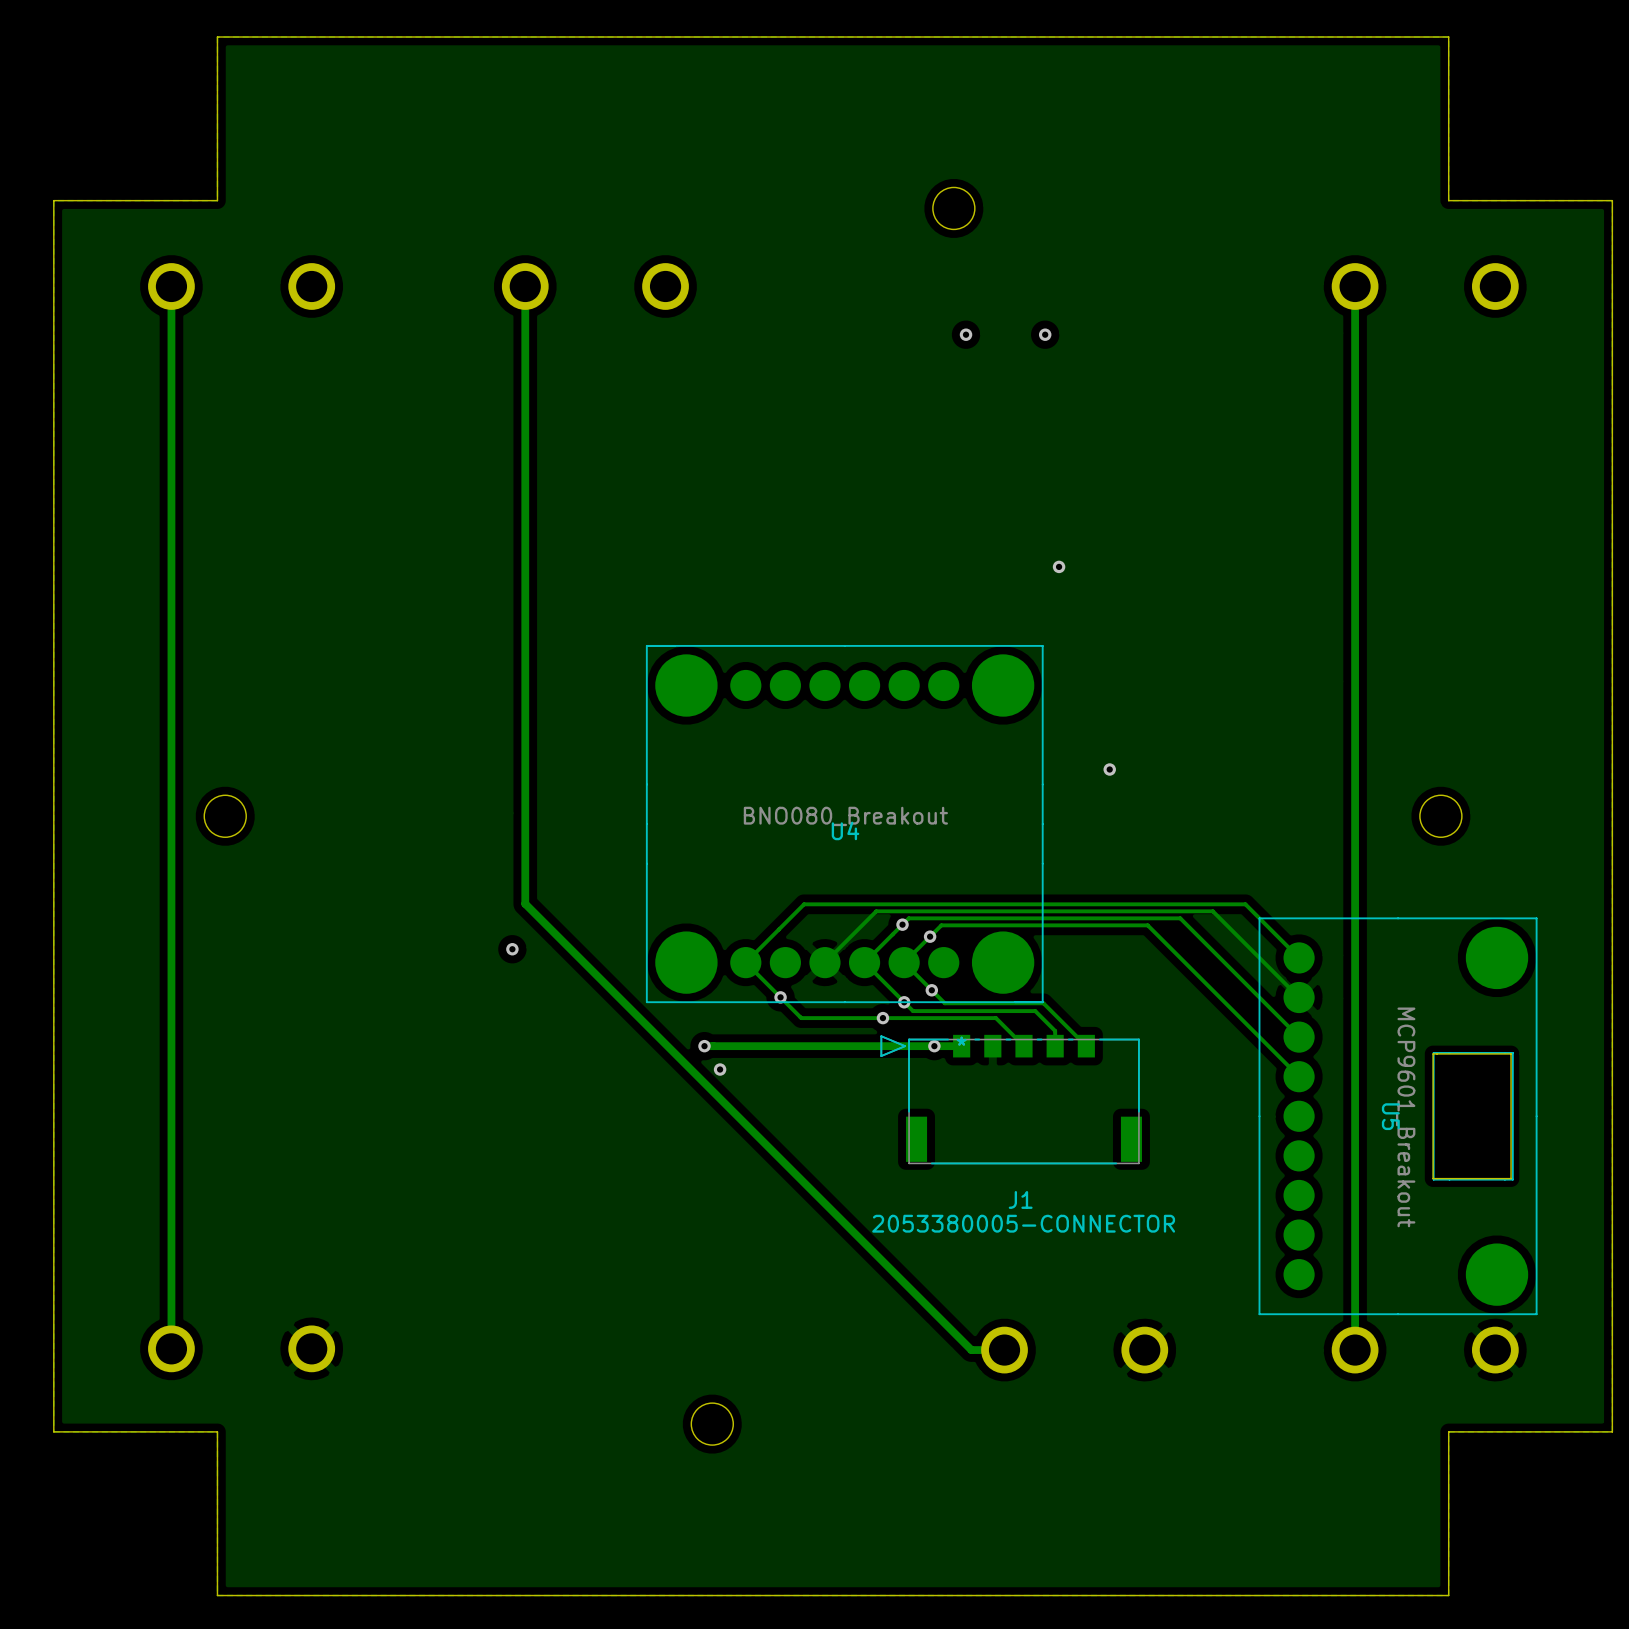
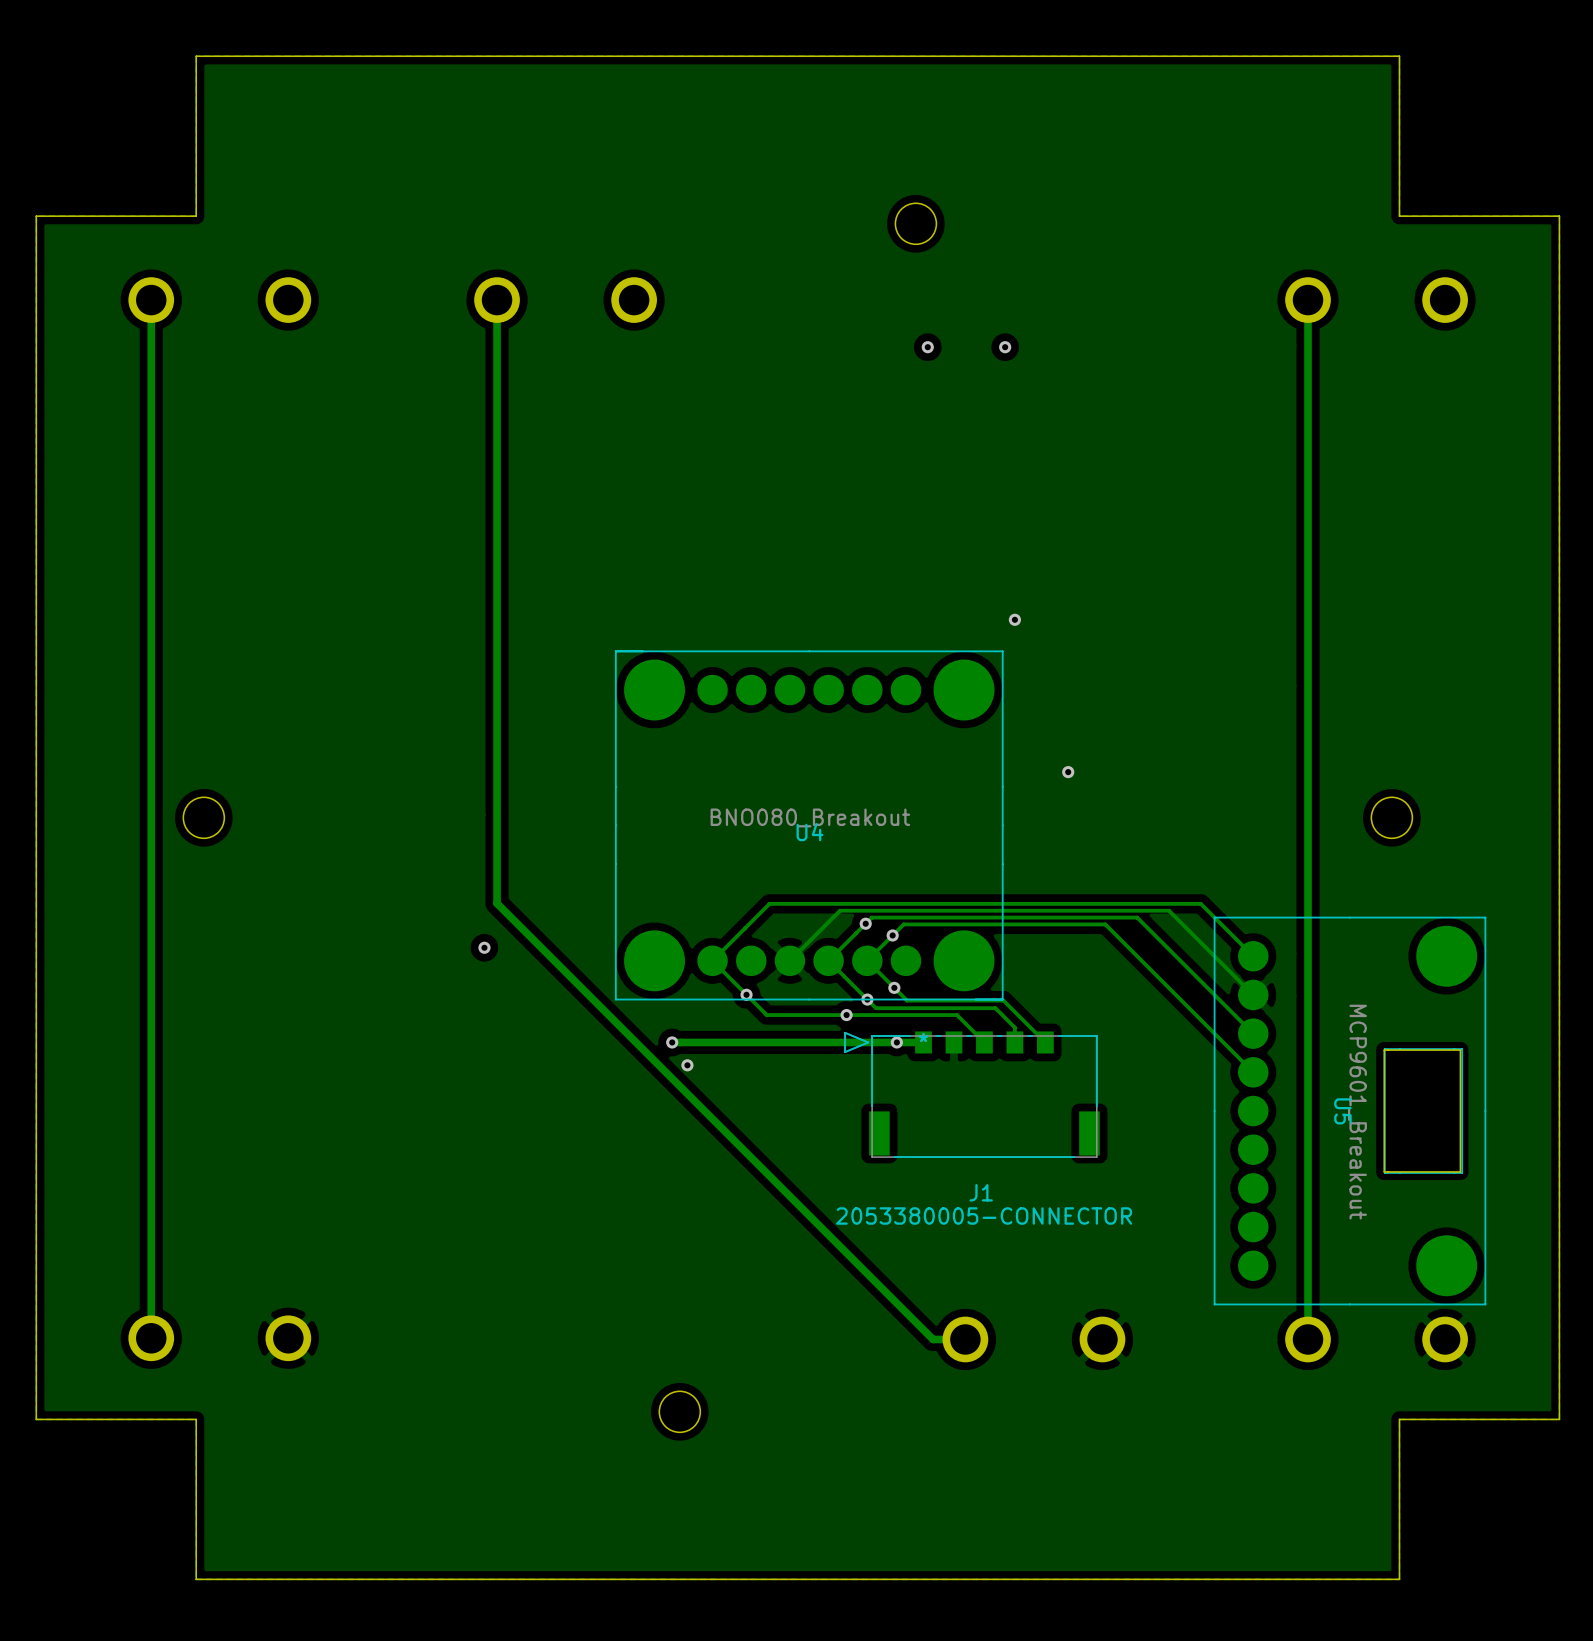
via position: (1059, 566) -> (1014, 619)

